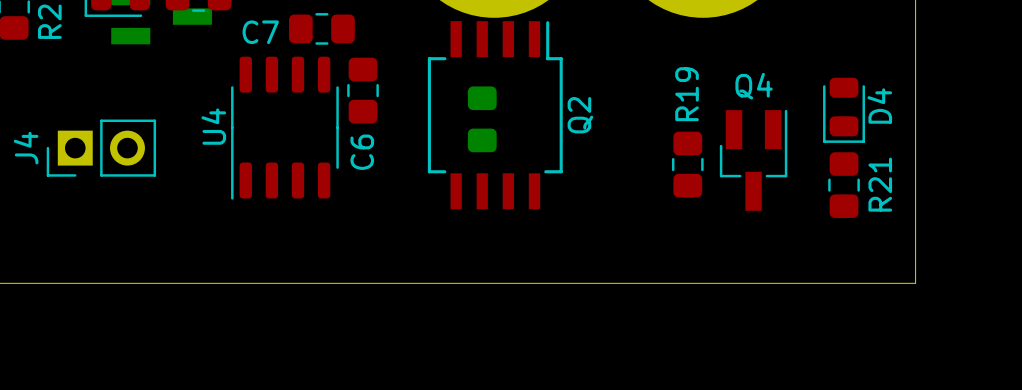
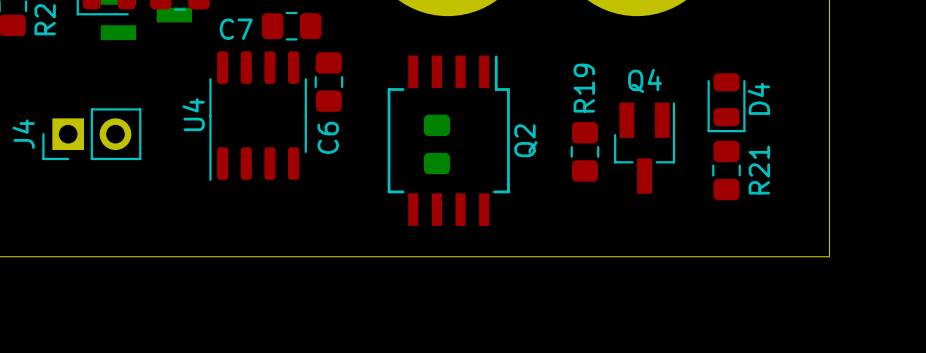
D4 position: (844, 110) -> (726, 102)
Q2 position: (495, 115) -> (448, 140)
part position: (482, 119) -> (436, 144)
Q4 position: (753, 160) -> (644, 148)
R19 position: (687, 164) -> (584, 151)
R21 position: (844, 185) -> (726, 170)

